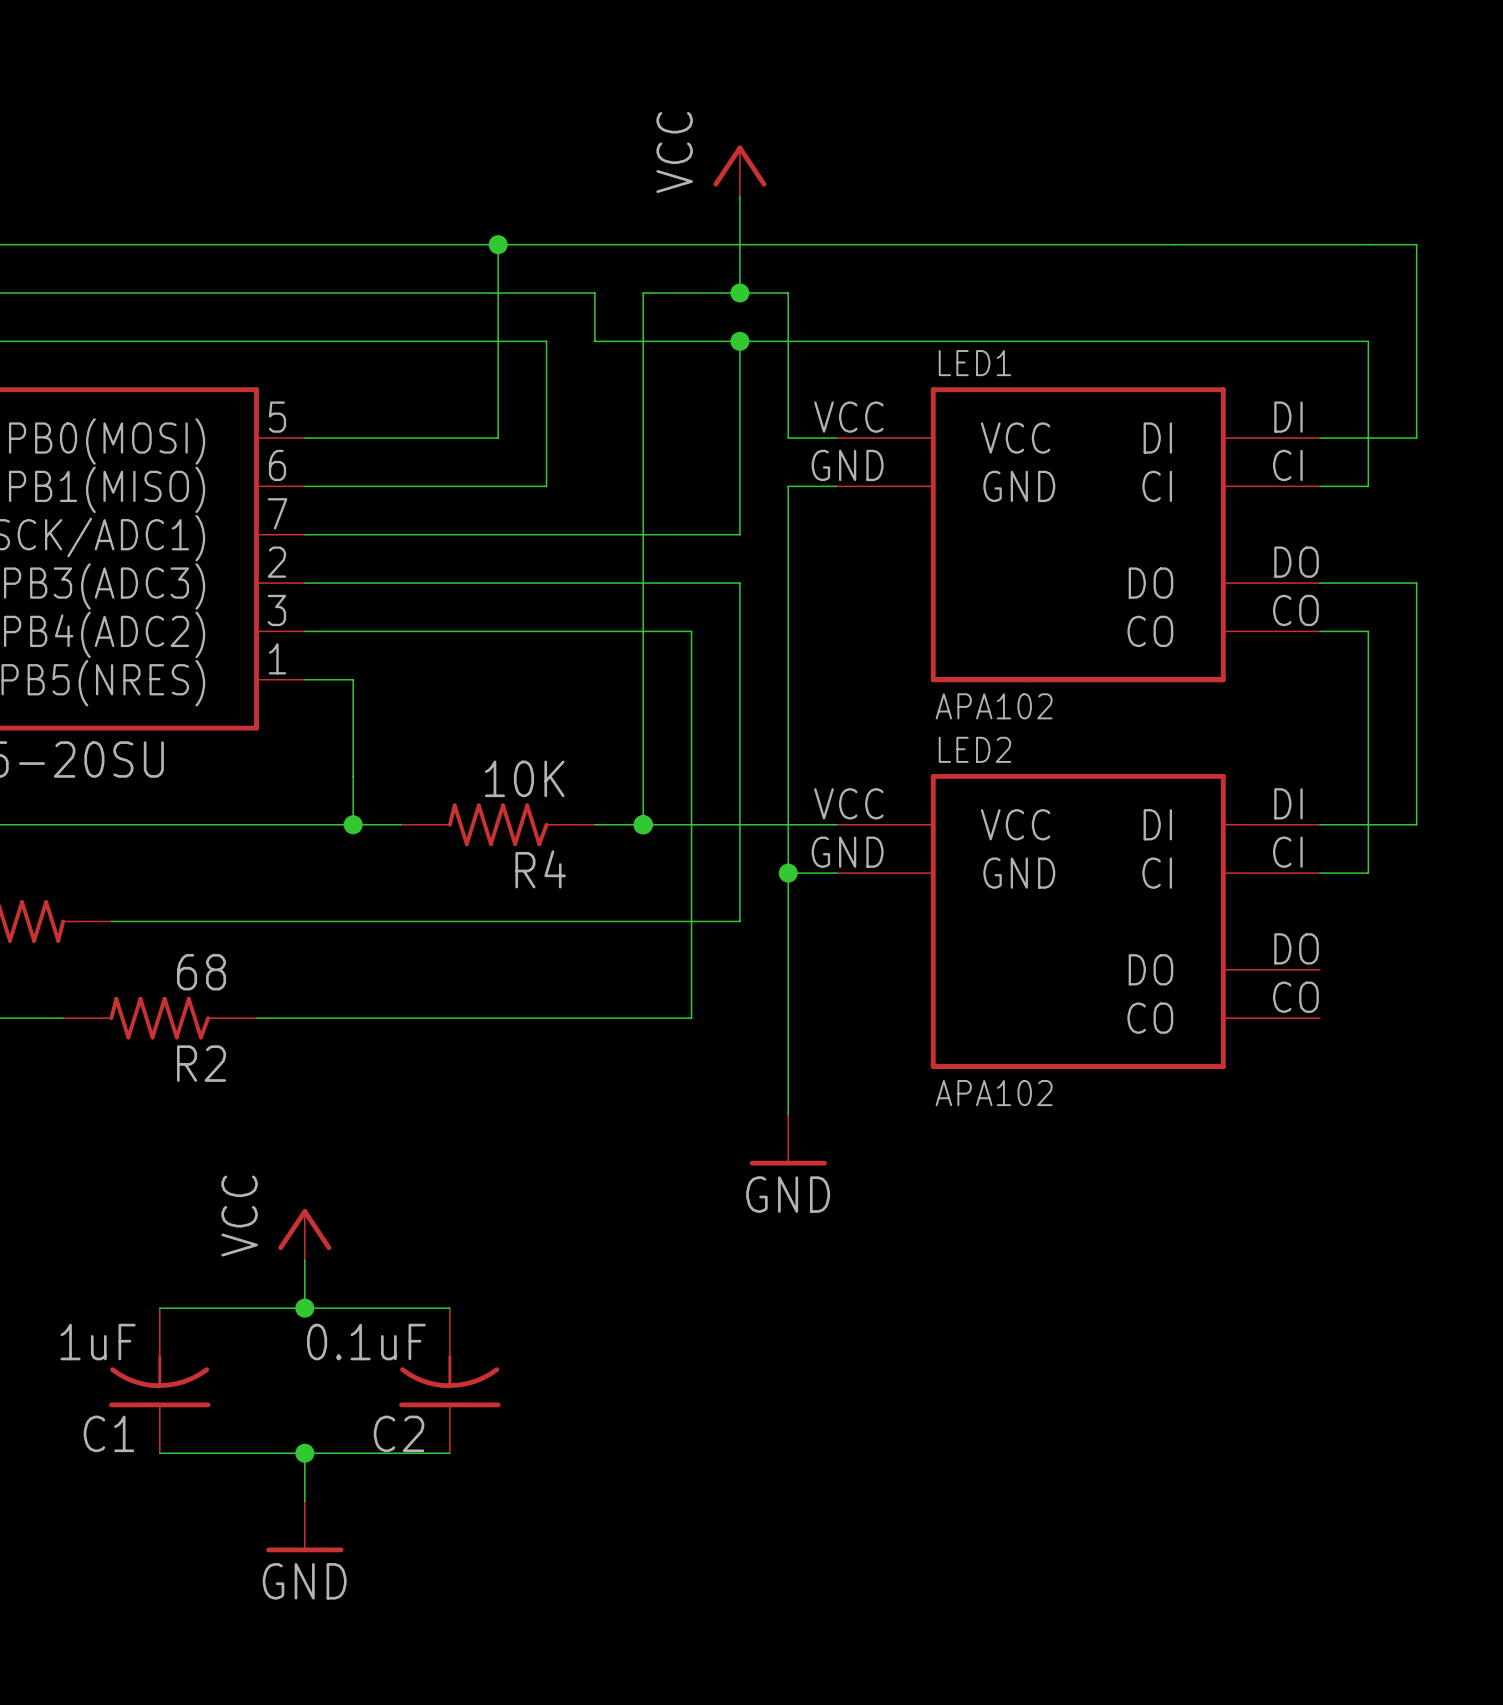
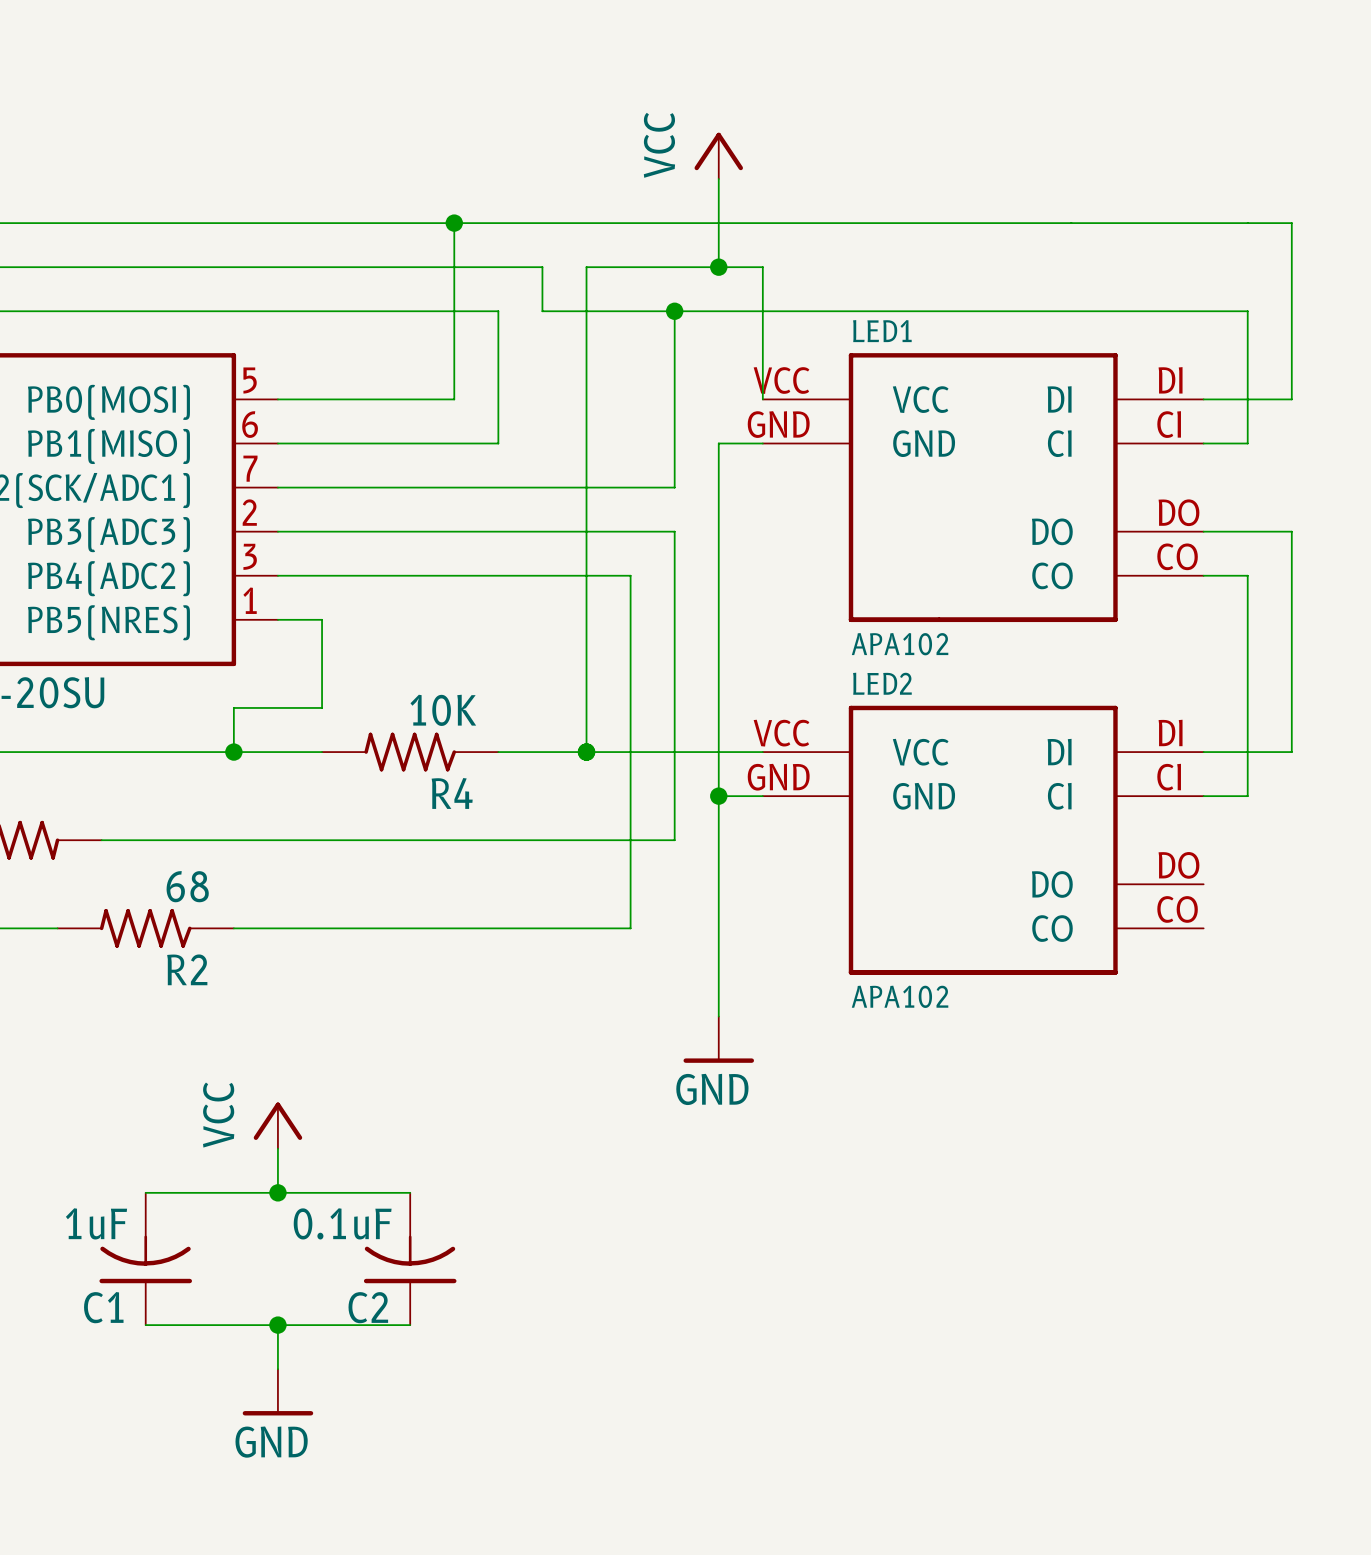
power symbol position: VCC (739, 170) -> VCC (718, 155)
wire: (739, 196) (739, 293) -> none
junction position: (739, 293) -> (718, 267)
wire: (788, 293) (788, 438) (836, 438) -> (718, 179) (718, 267) (762, 267) (762, 399)
wire: (353, 776) (353, 824) (401, 824) -> (322, 707) (233, 707) (233, 752)
junction position: (353, 824) -> (233, 752)
R4 position: (498, 824) -> (410, 752)

